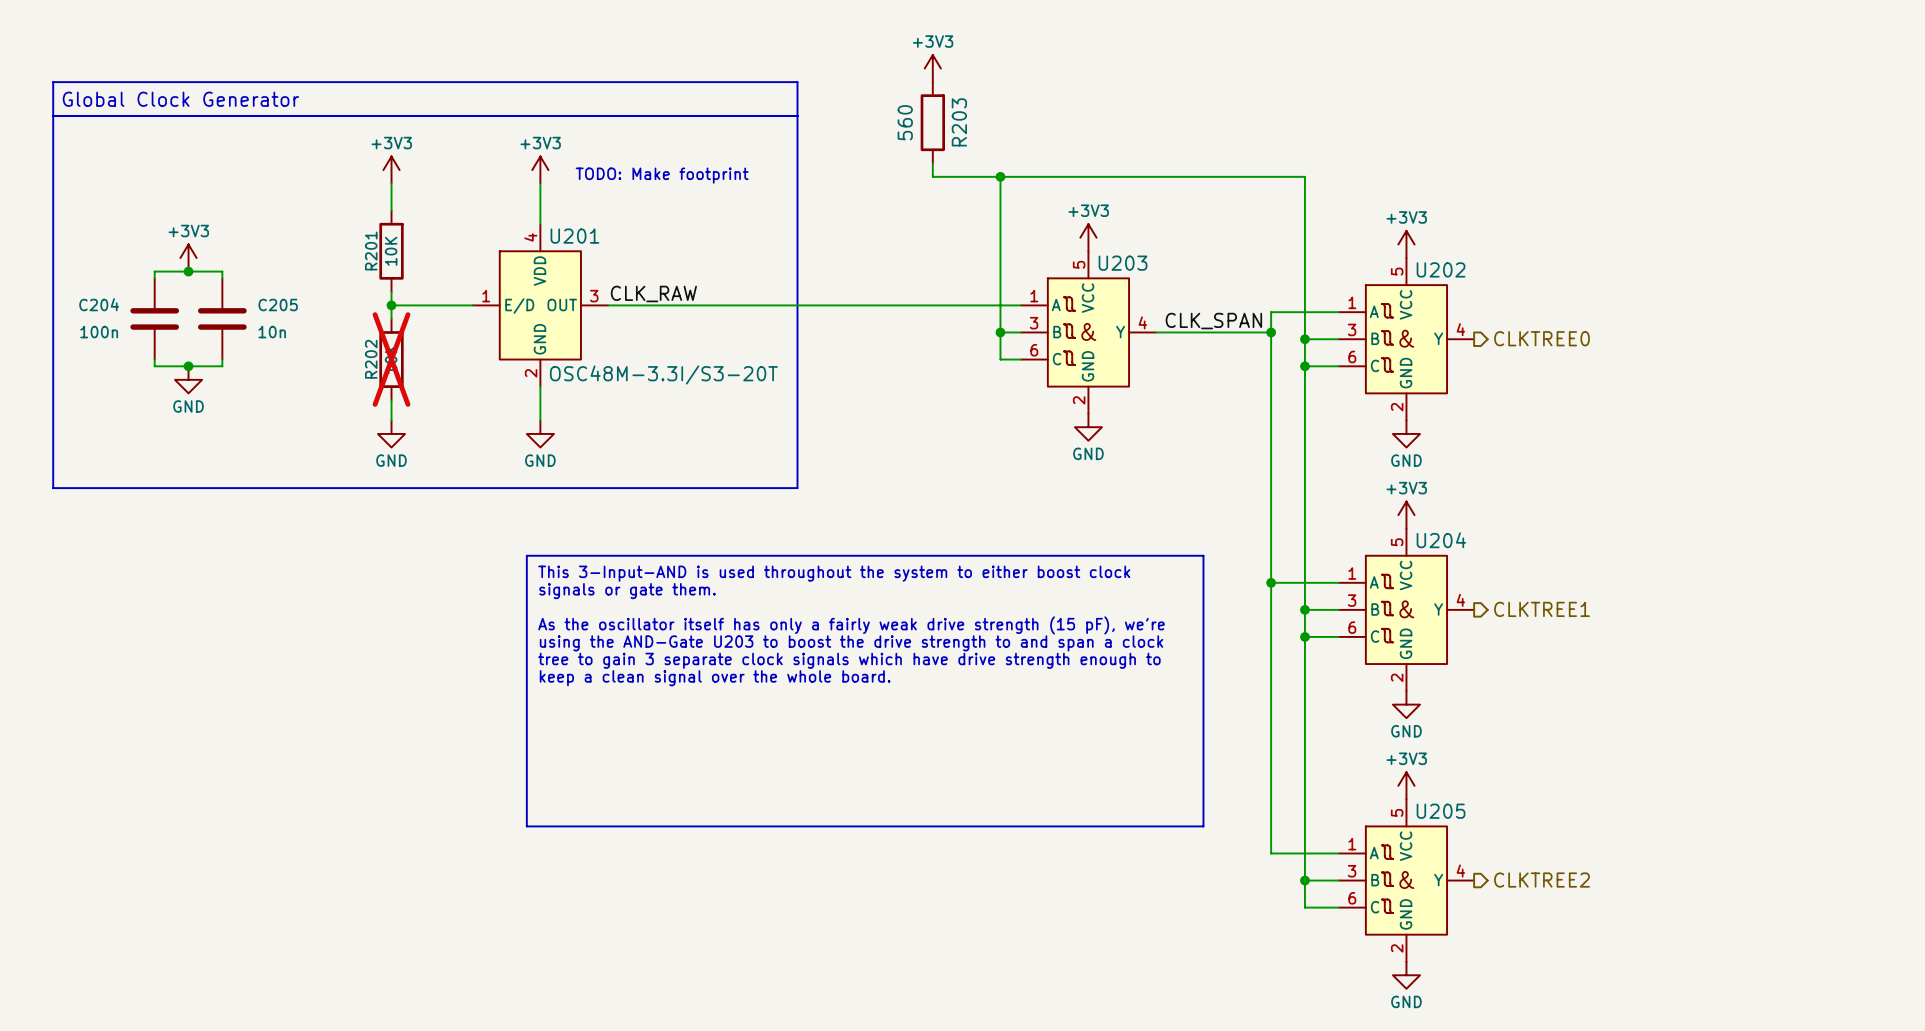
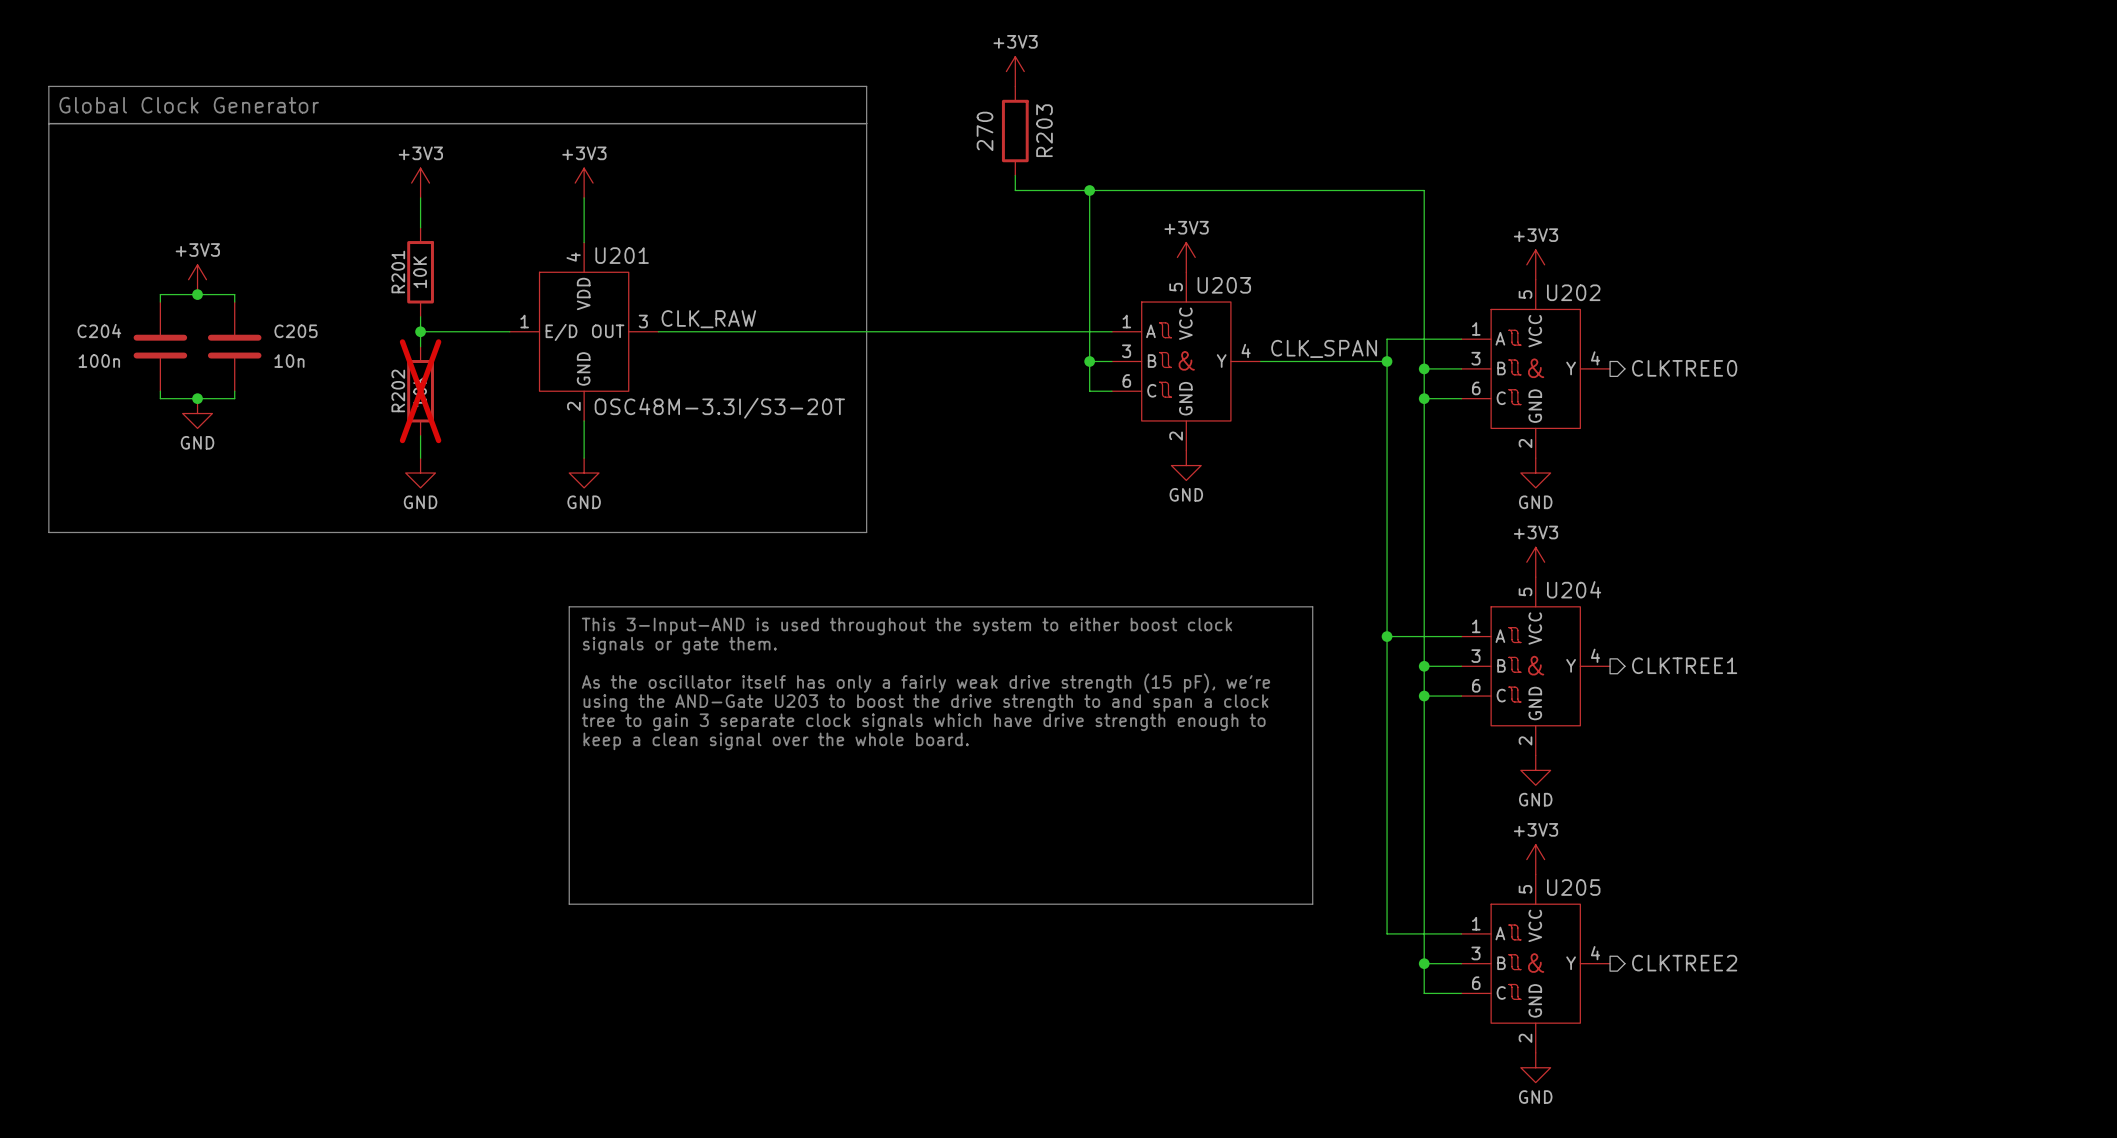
R203 value: 560 (905, 122) -> 270 (985, 131)
text: TODO: Make footprint (662, 175) -> none

